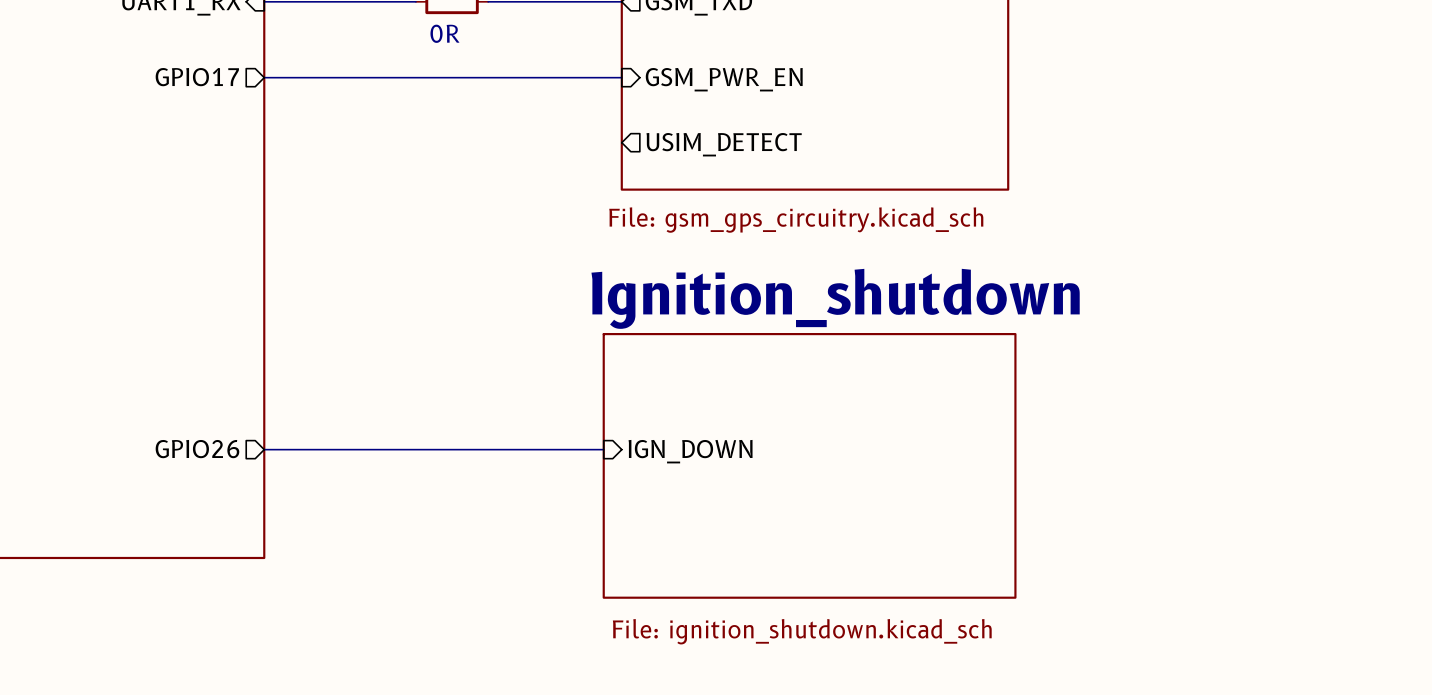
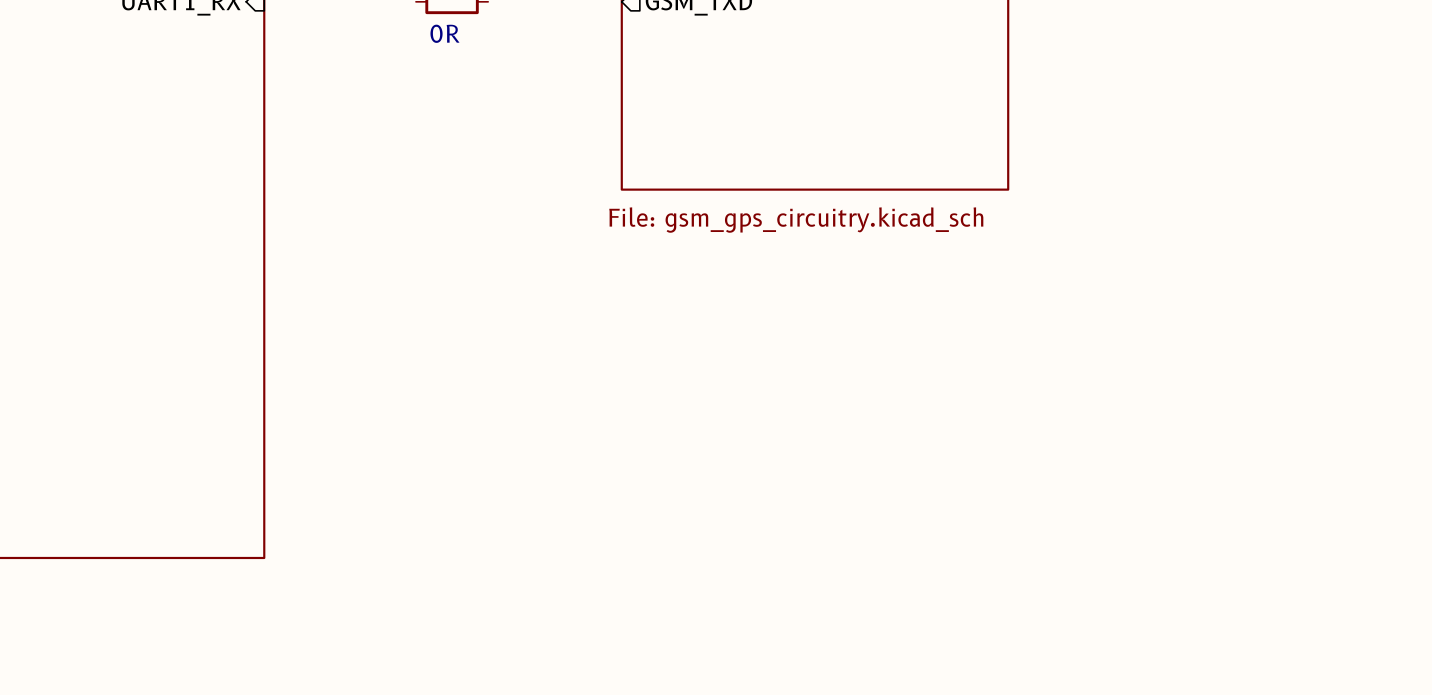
wire: (264, 1) (415, 1) -> none
wire: (488, 1) (621, 1) -> none
sheet pin: GPIO17 (197, 77) -> none
wire: (264, 77) (621, 77) -> none
sheet pin: GSM_PWR_EN (724, 79) -> none
sheet pin: USIM_DETECT (724, 144) -> none
sheet pin: GPIO26 (197, 449) -> none
wire: (264, 449) (603, 449) -> none
sheet pin: IGN_DOWN (690, 451) -> none
sheet Ignition_shutdown: File: ignition_shutdown.kicad_sch (809, 465) -> none

